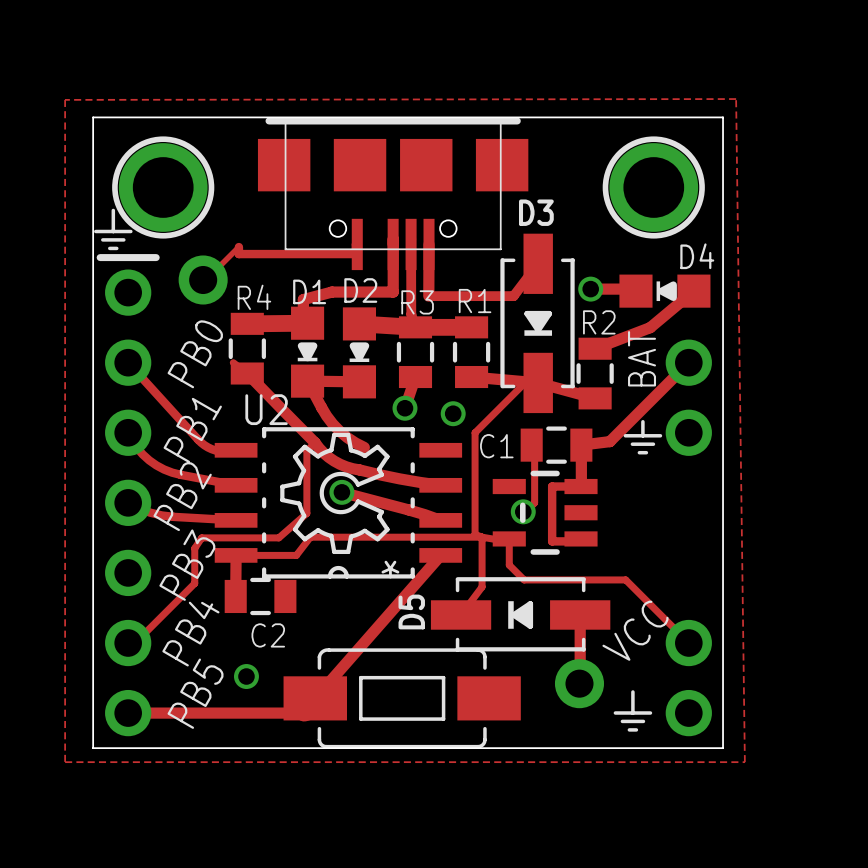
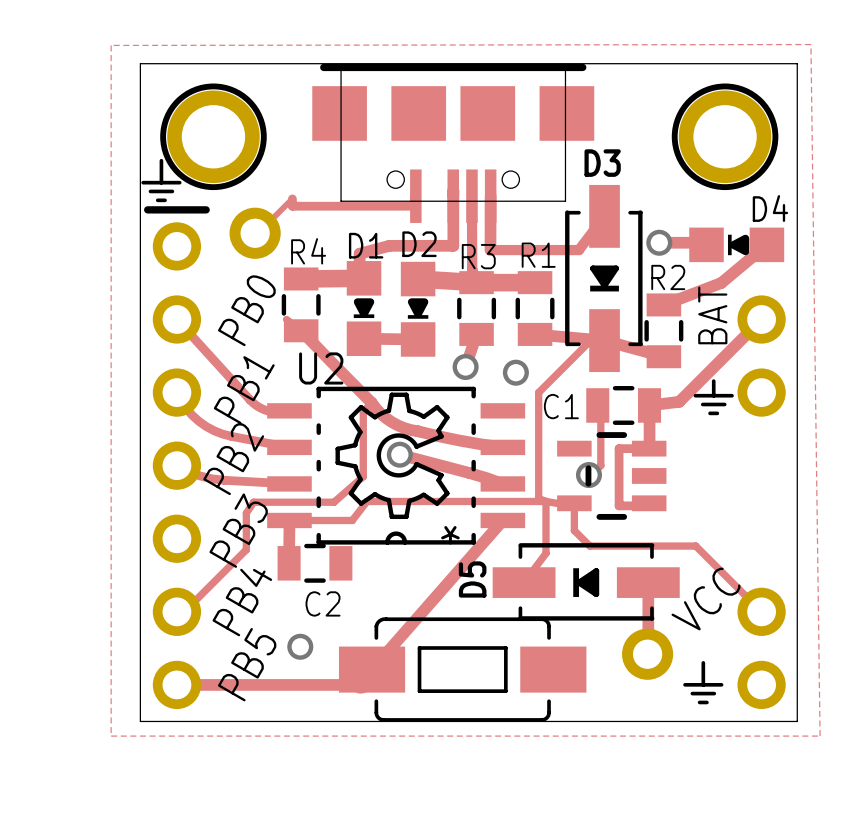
track: (307, 381) (332, 423) (347, 437) (364, 447) -> none

